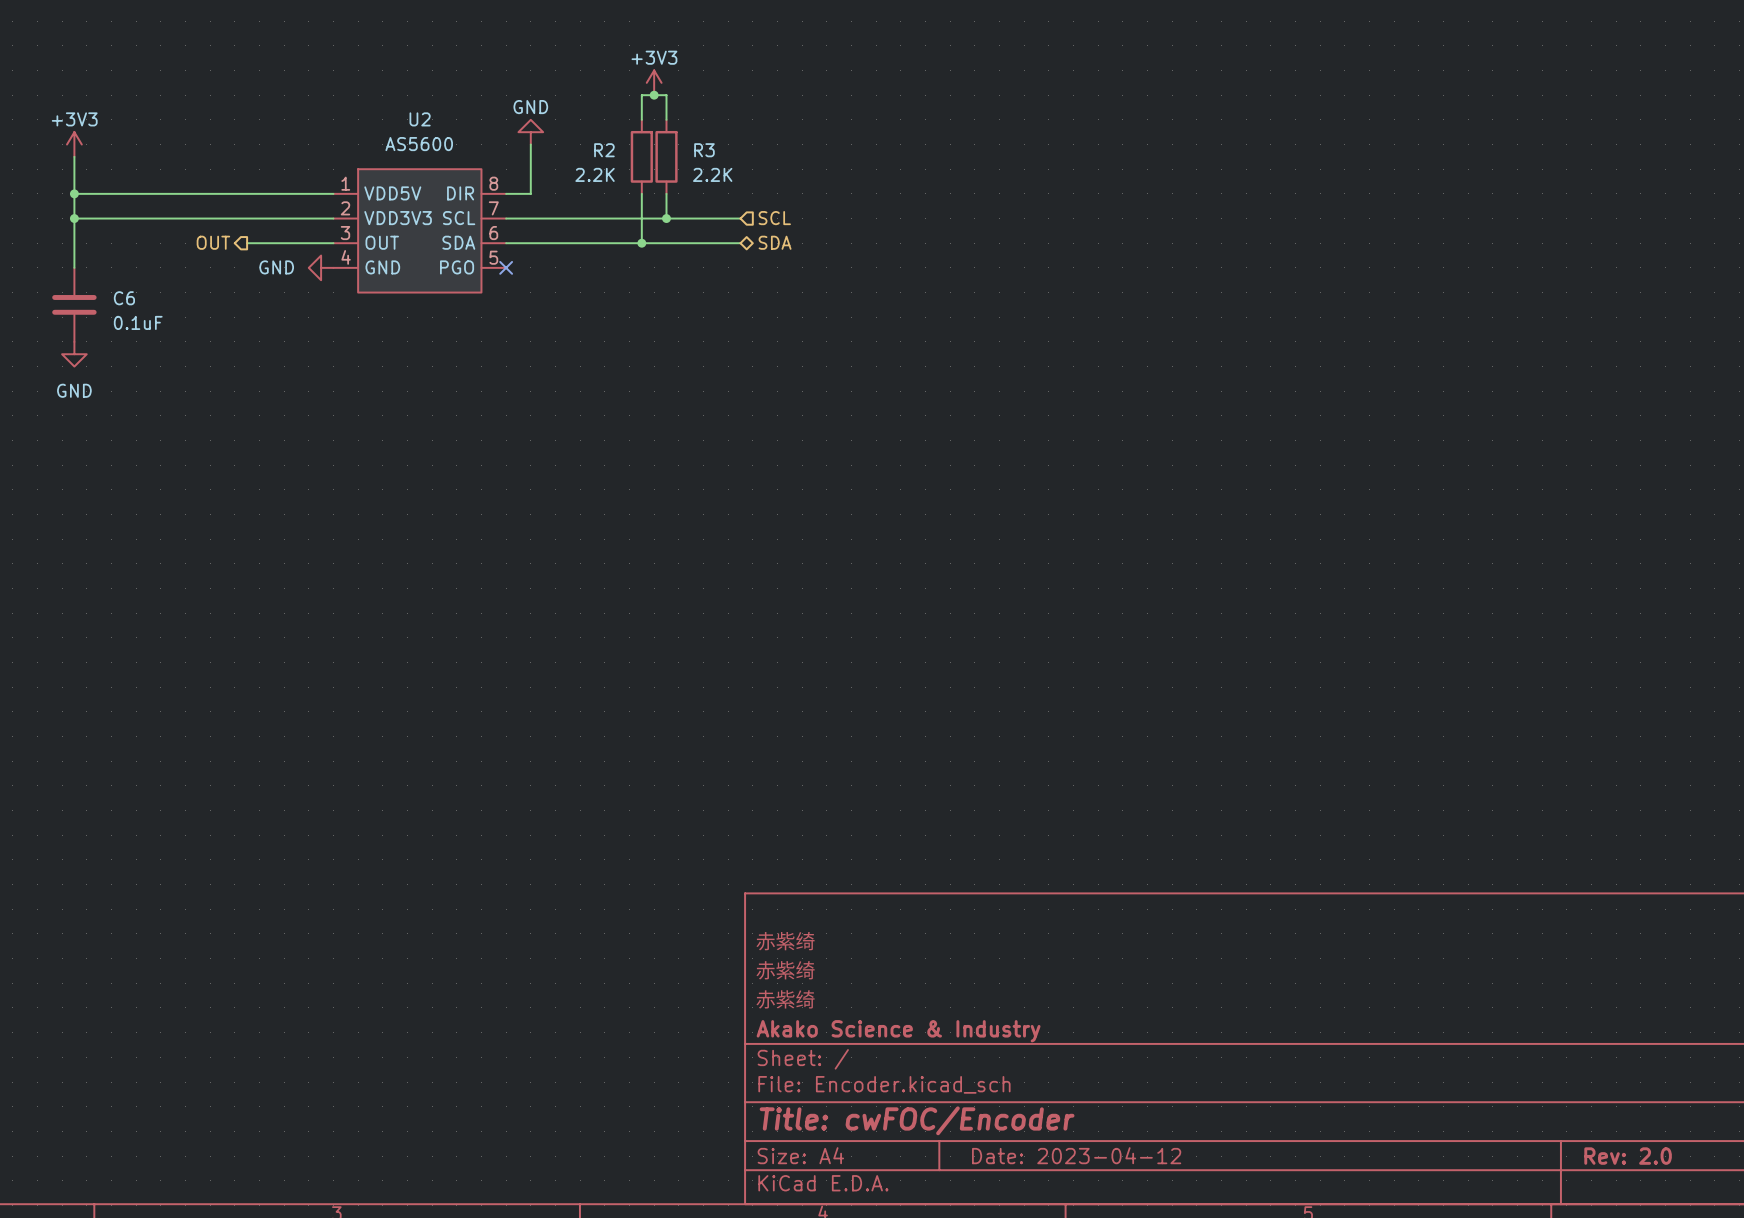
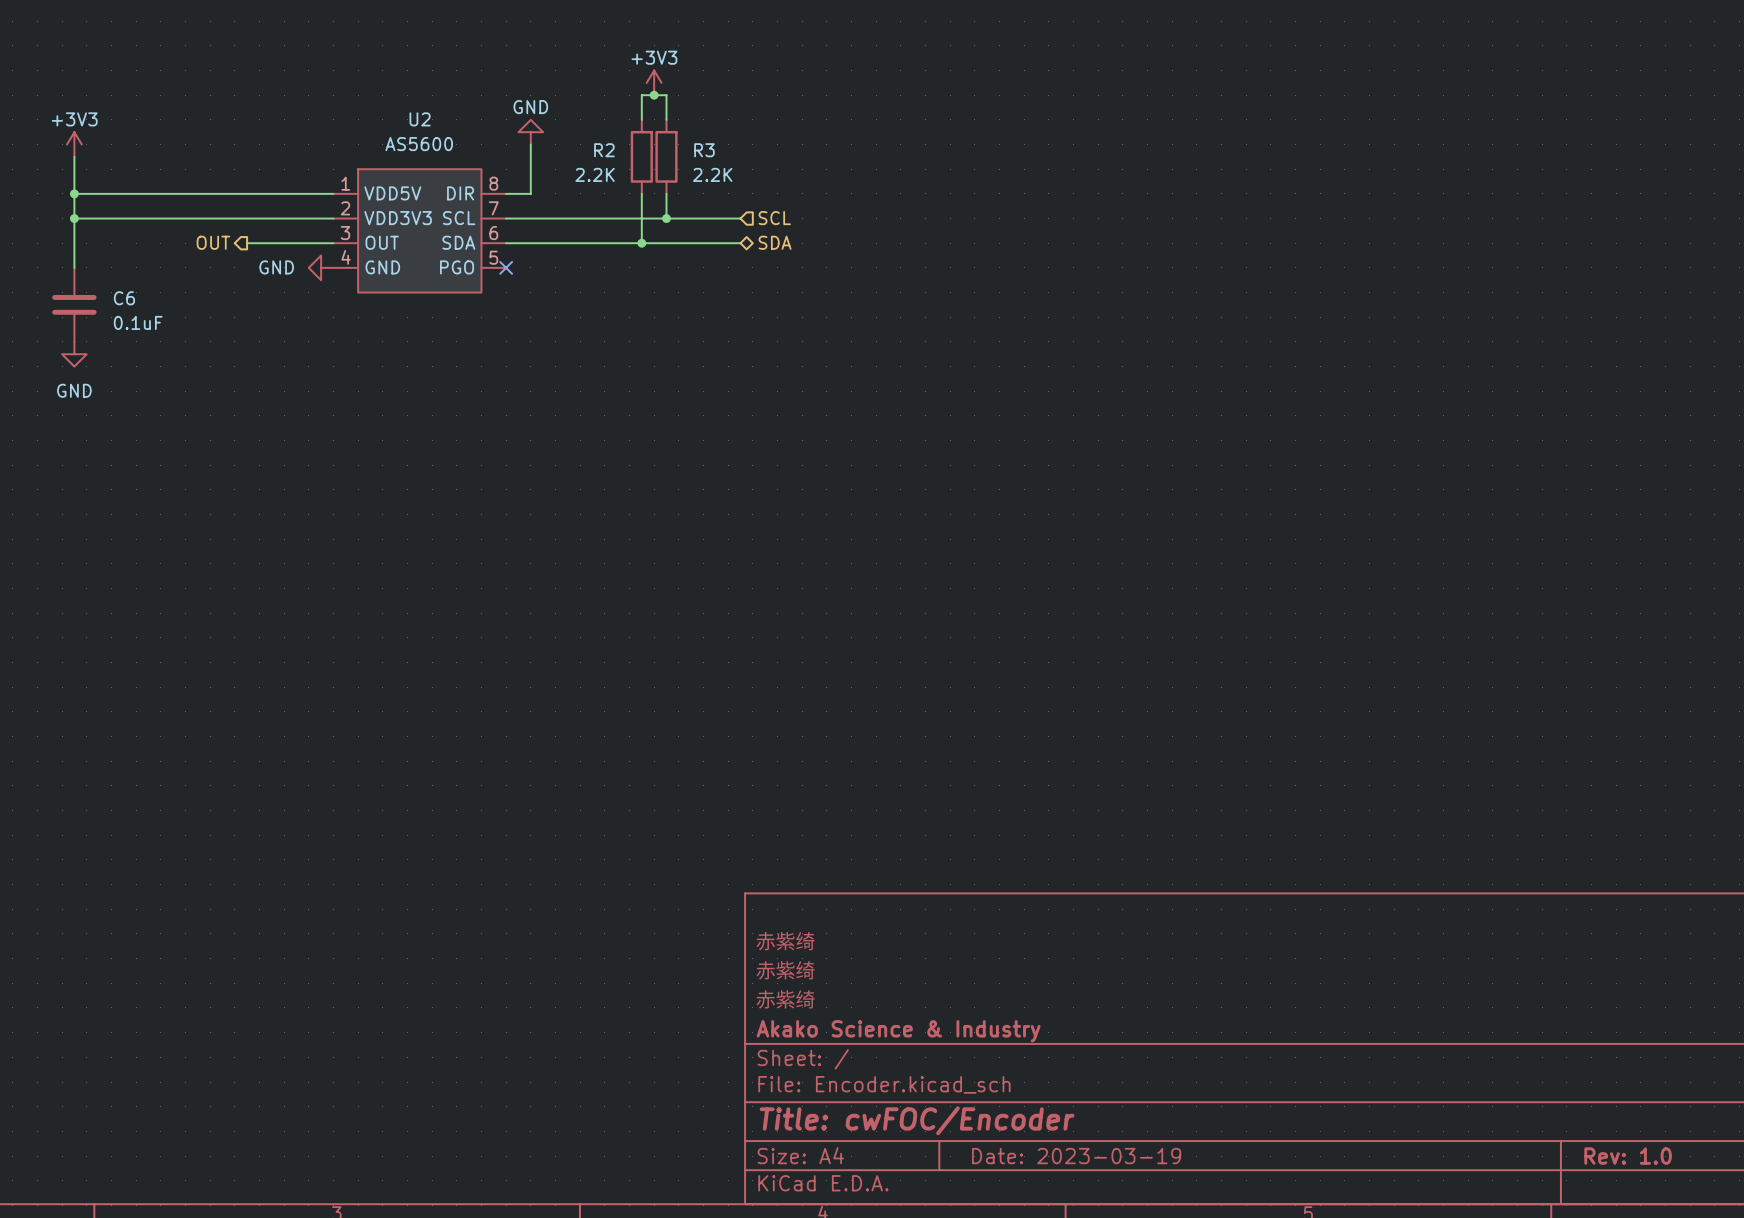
title block: Date: 2023-04-12 (1076, 1155) -> Date: 2023-03-19 (1076, 1156)
title block: Rev: 2.0 (1628, 1156) -> Rev: 1.0 (1628, 1156)

